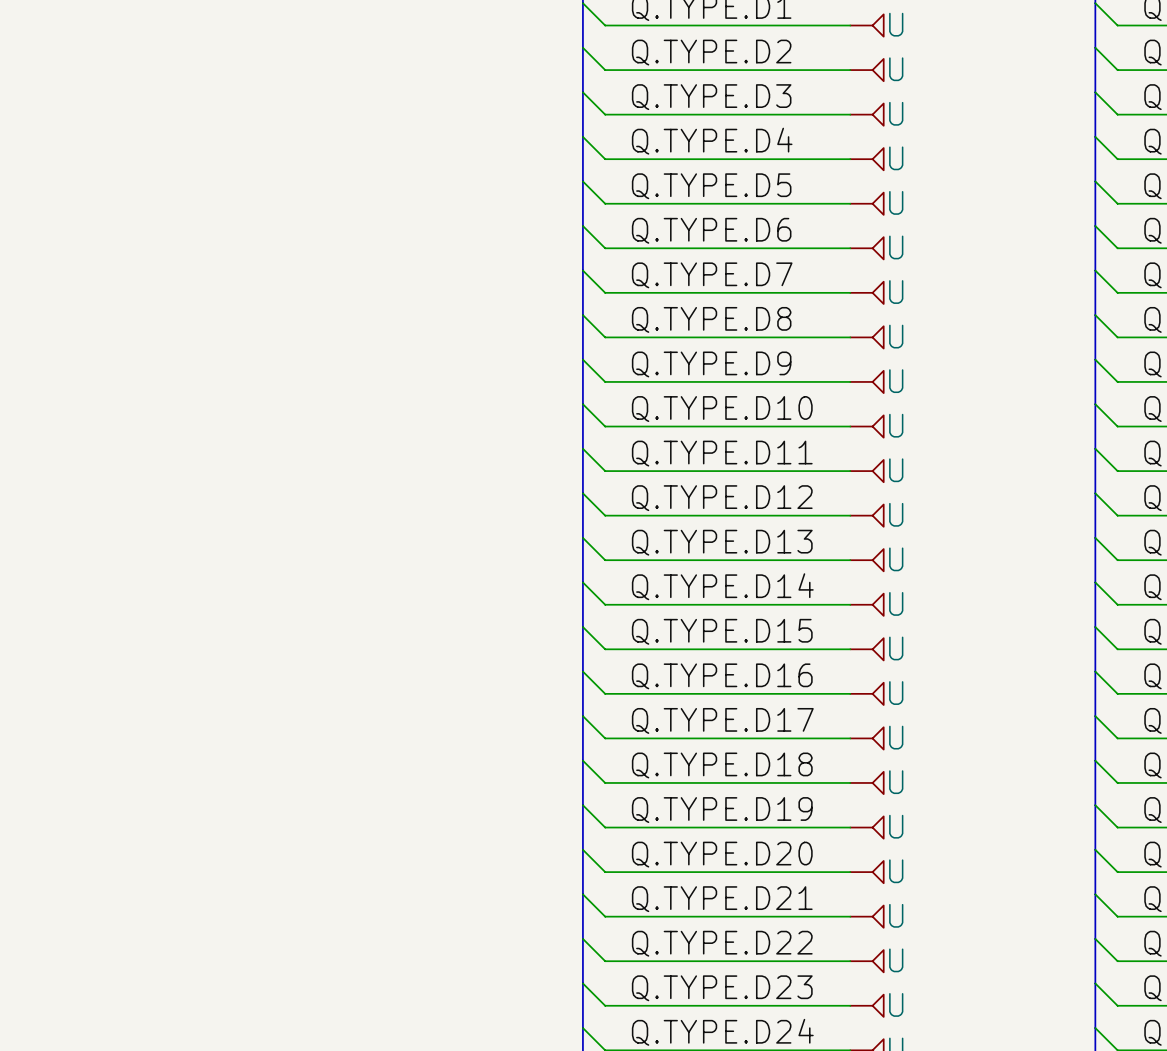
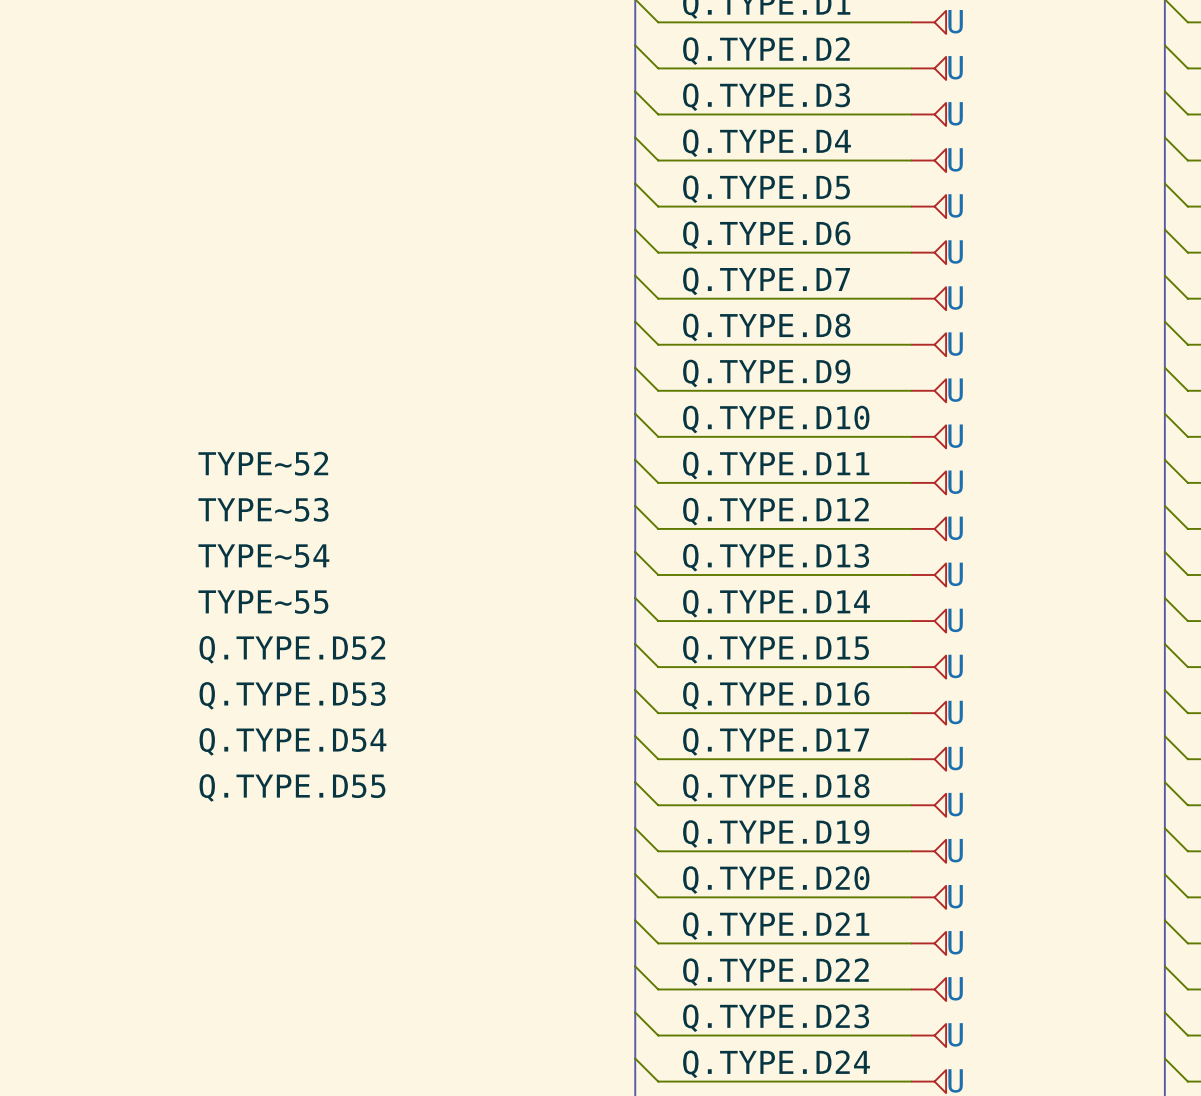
label: none -> TYPE~52 (263, 463)
label: none -> TYPE~53 (263, 509)
label: none -> TYPE~54 (263, 556)
label: none -> TYPE~55 (263, 602)
label: none -> Q.TYPE.D52 (292, 649)
label: none -> Q.TYPE.D53 (292, 695)
label: none -> Q.TYPE.D54 (292, 741)
label: none -> Q.TYPE.D55 (292, 787)

